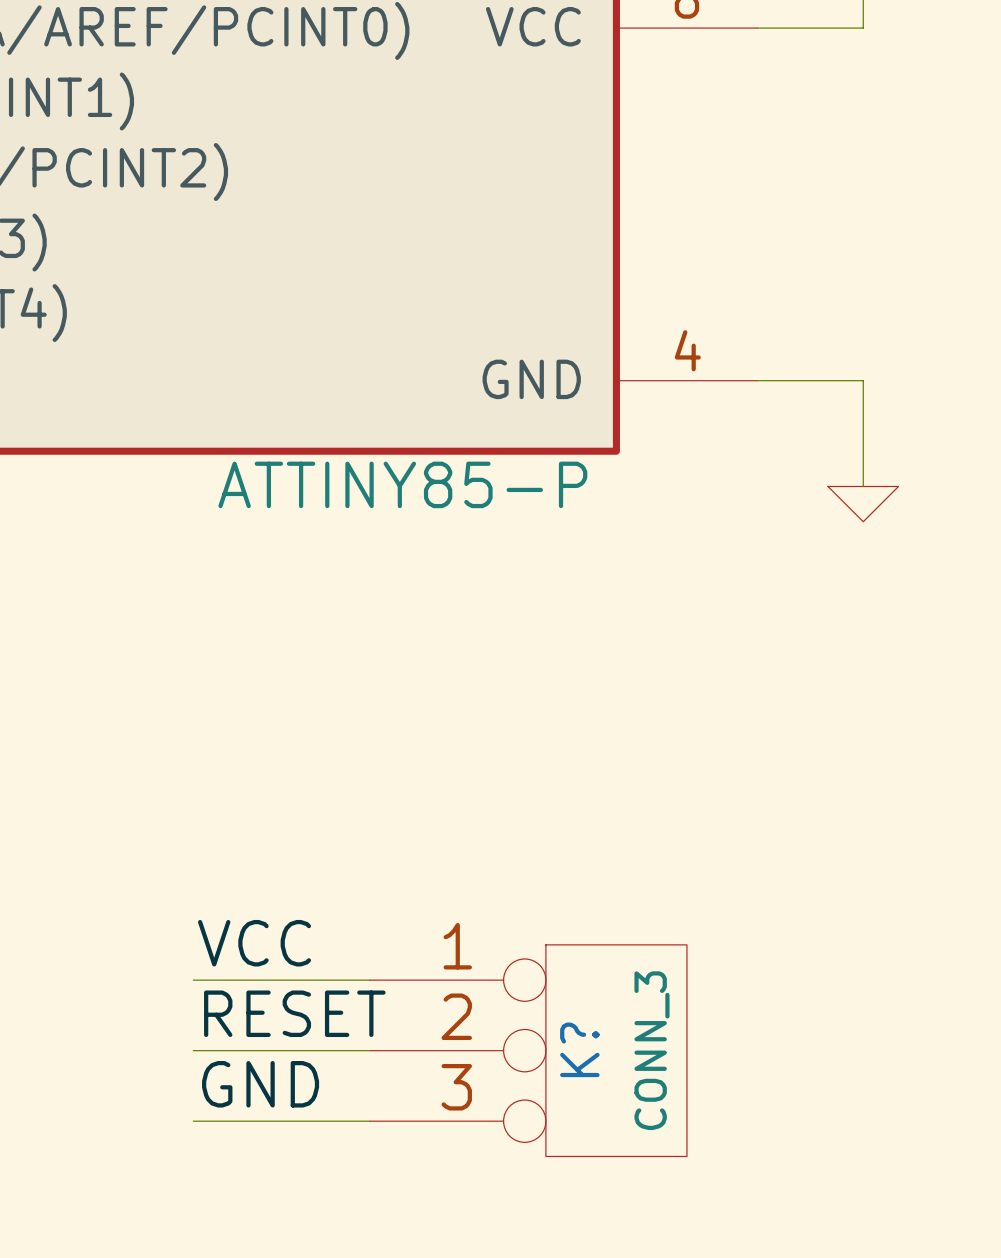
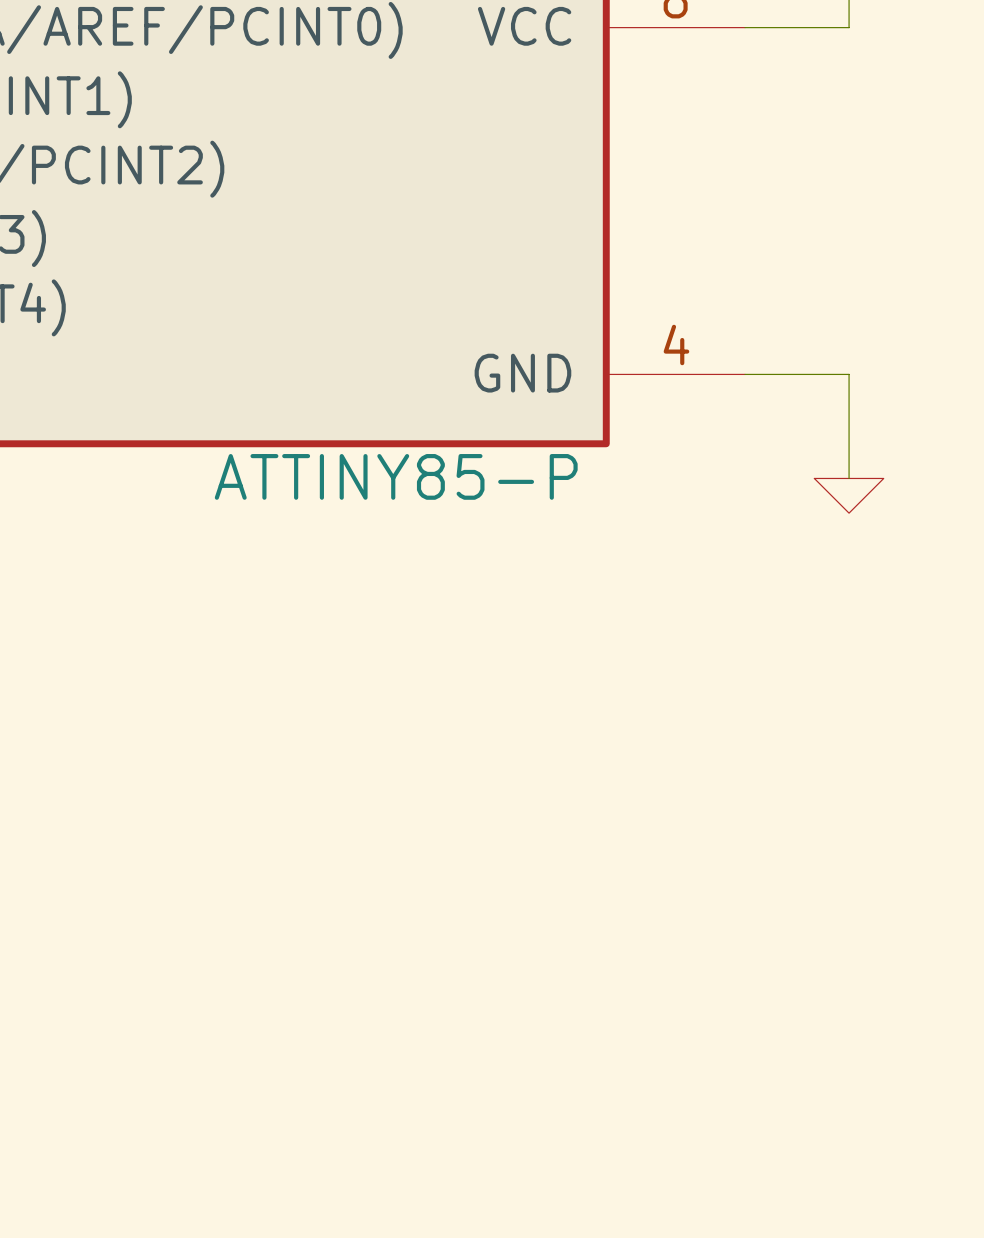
label: VCC (254, 943) -> none
wire: (193, 980) (369, 980) -> none
label: RESET (294, 1013) -> none
wire: (193, 1050) (369, 1050) -> none
K?: CONN_3 (528, 1050) -> none
label: GND (260, 1084) -> none
wire: (193, 1121) (369, 1121) -> none

